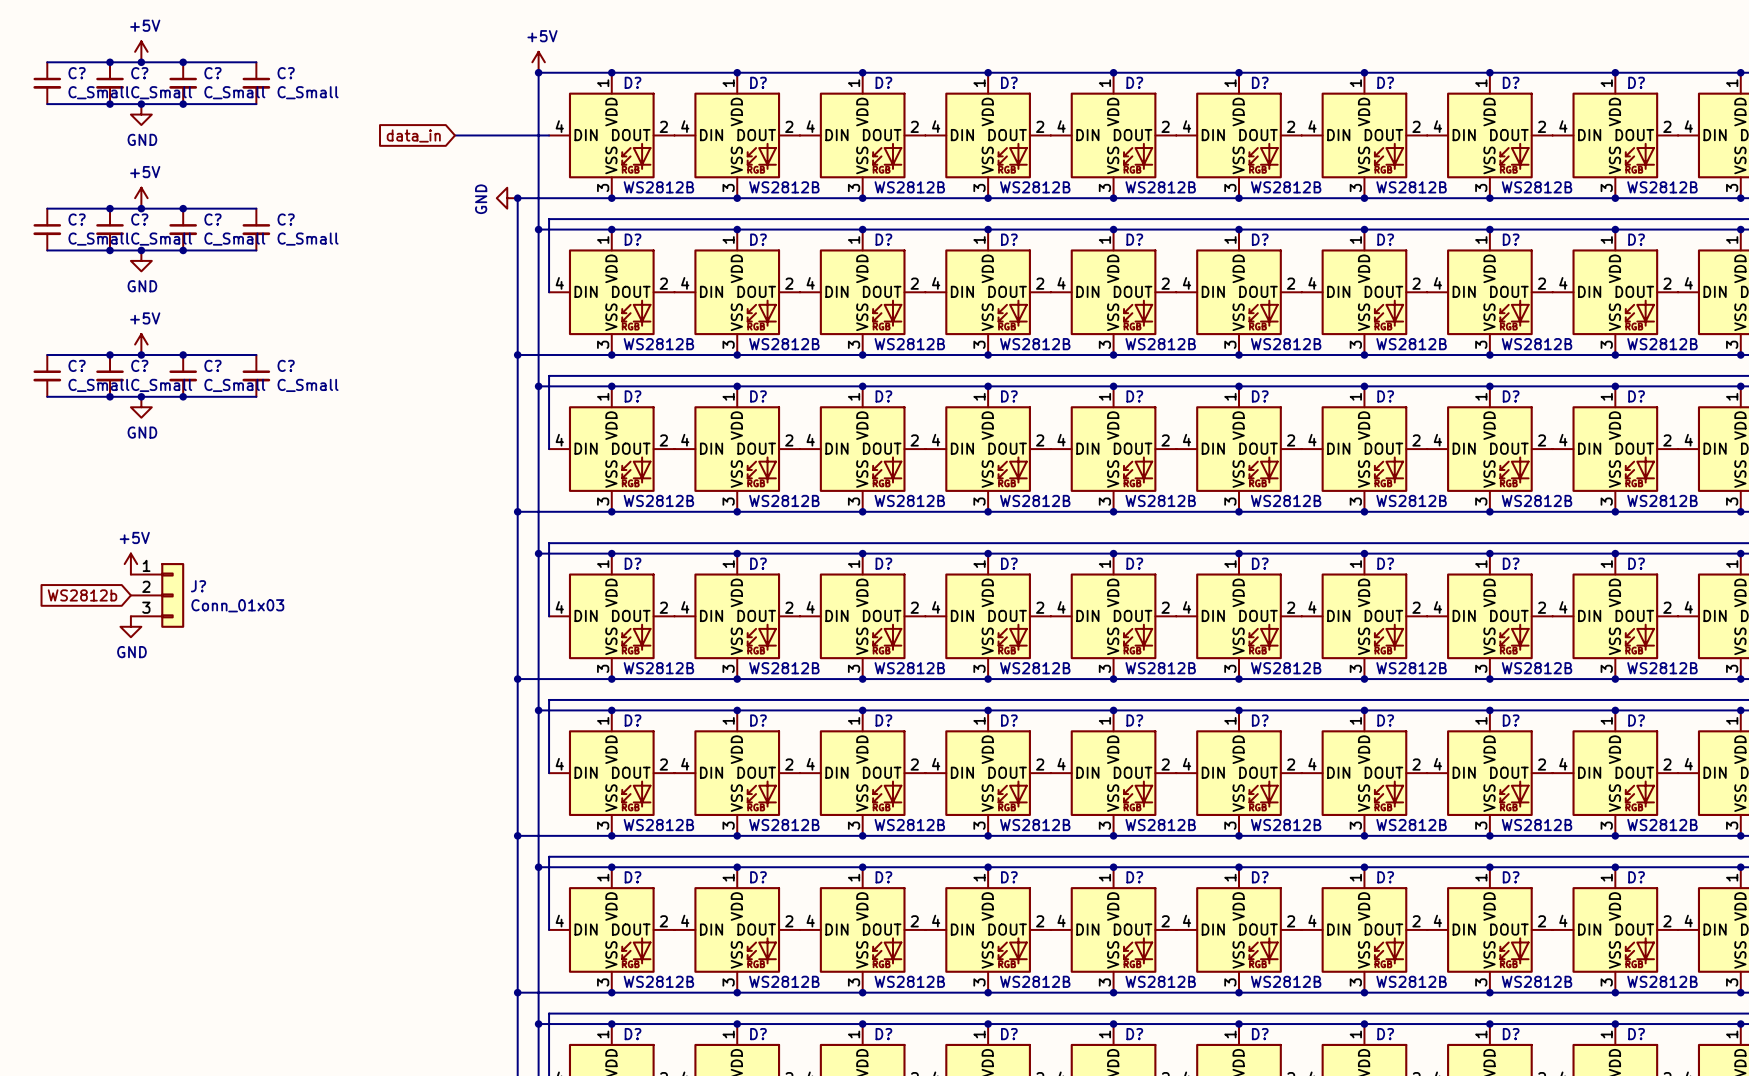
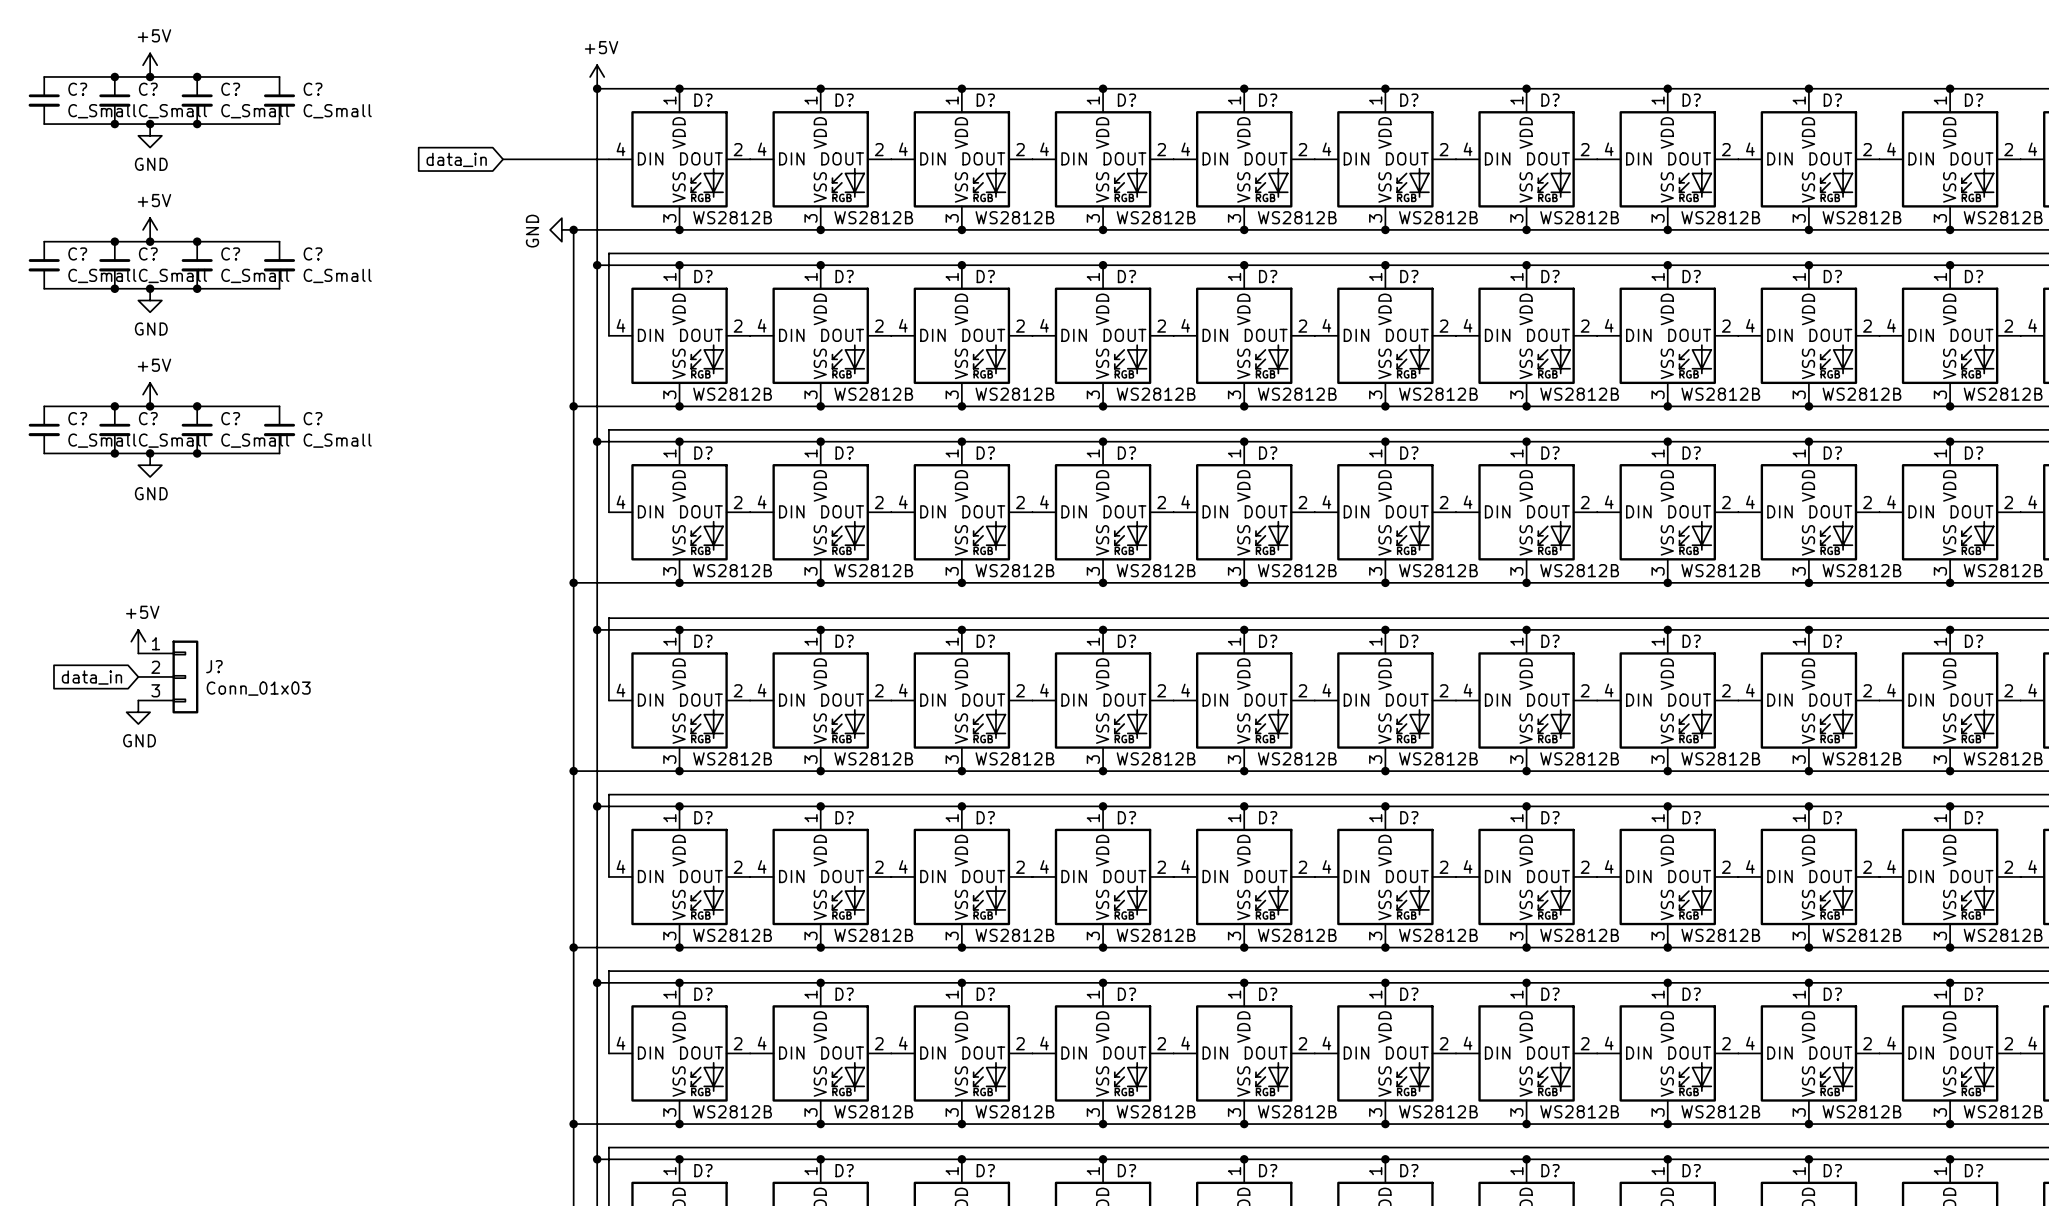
global label: WS2812b (82, 595) -> data_in (91, 677)

